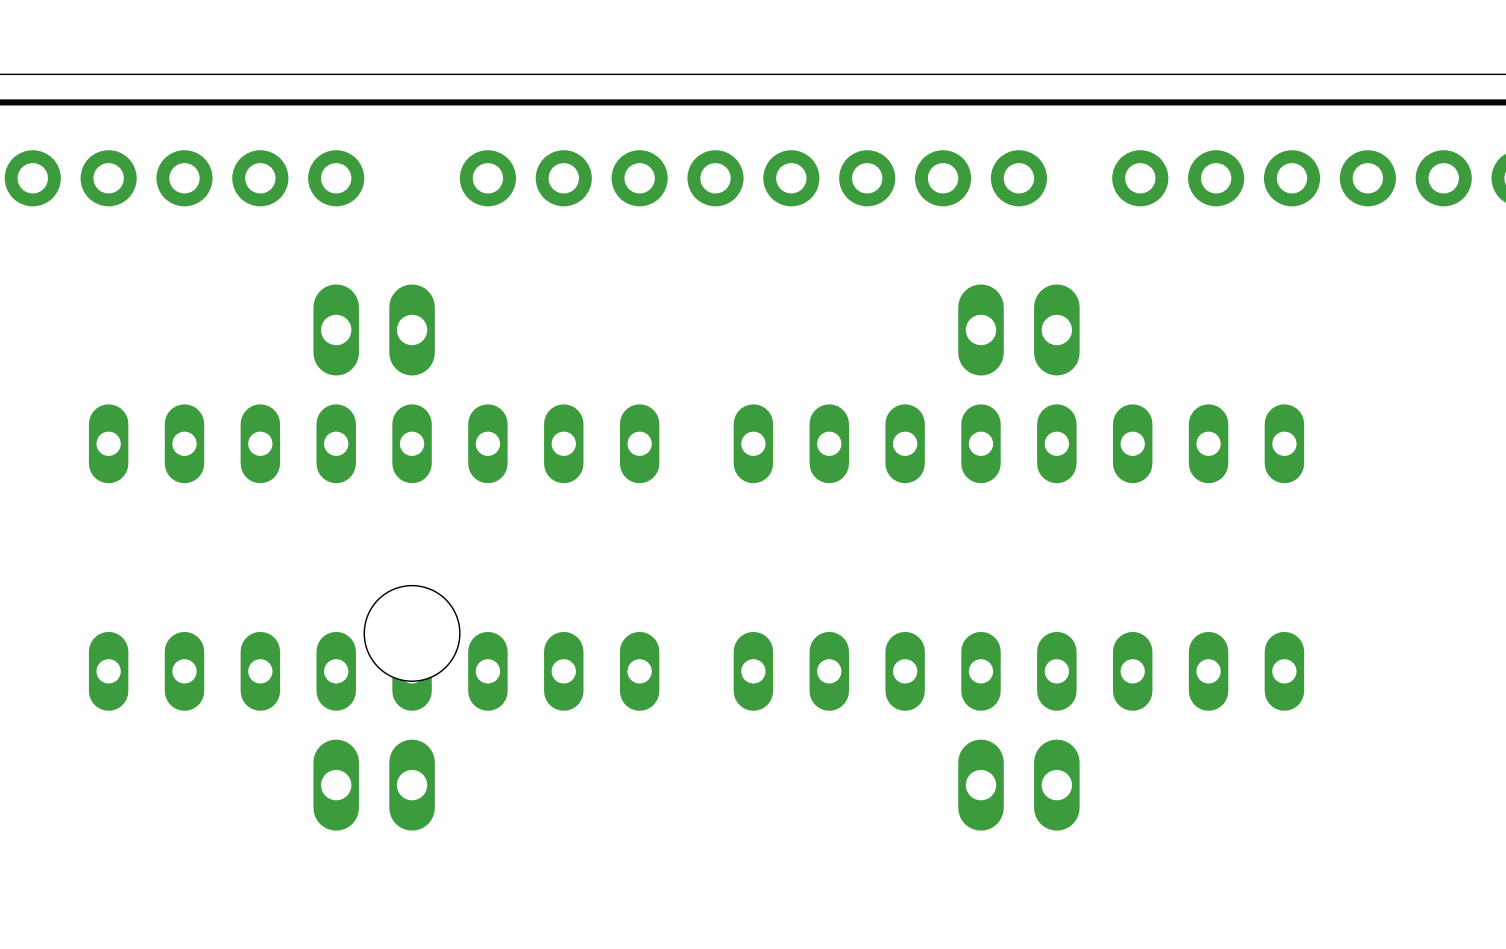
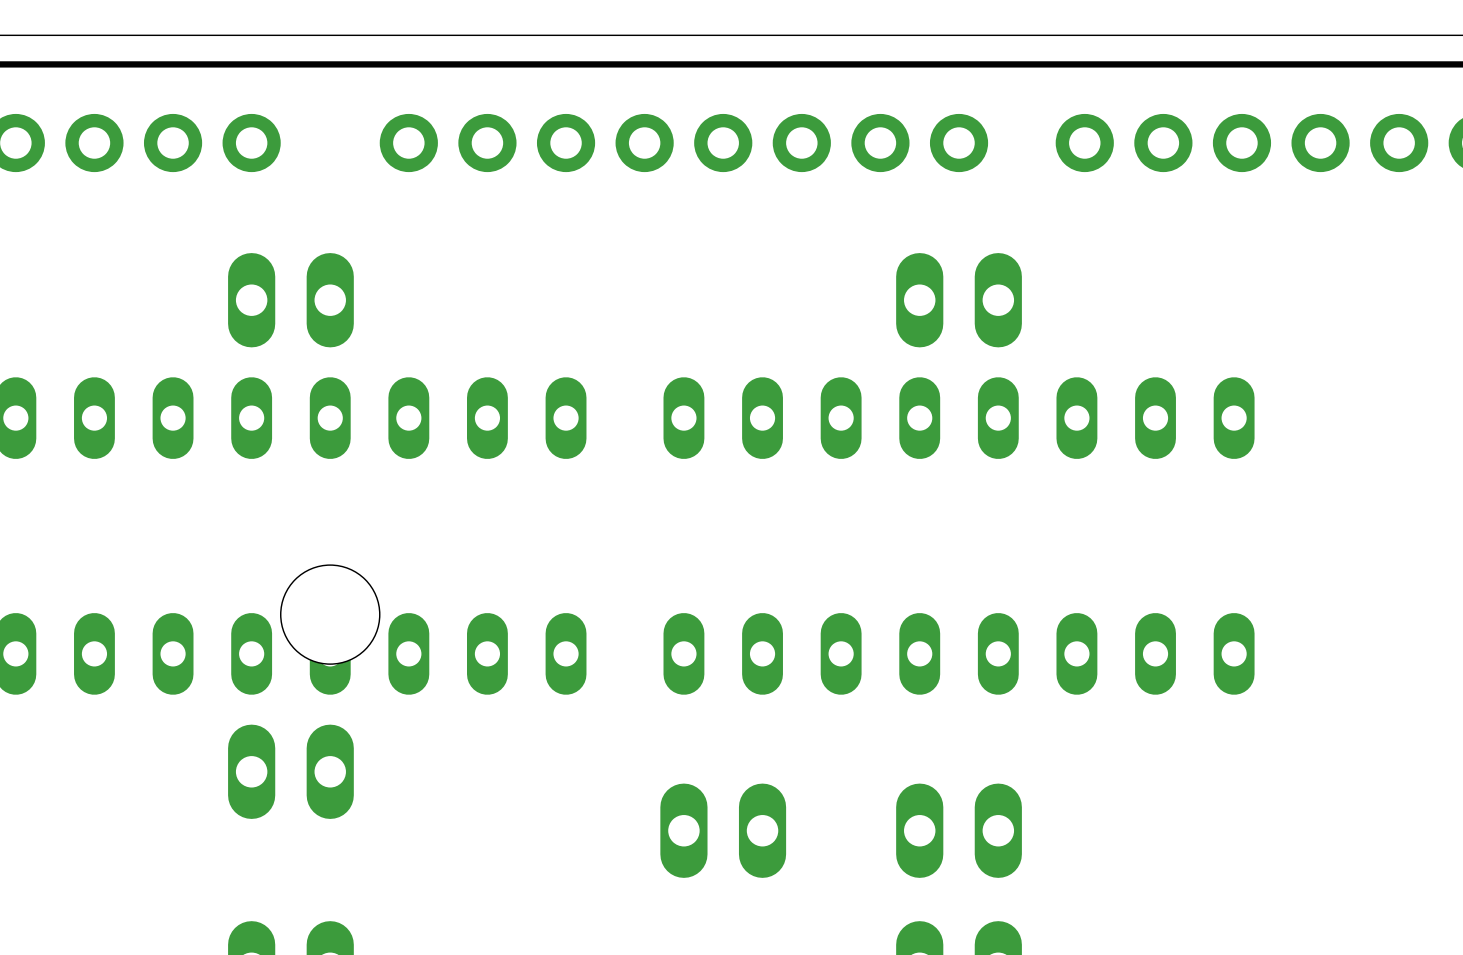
part position: (1018, 785) -> (959, 830)
part: none -> (723, 830)

